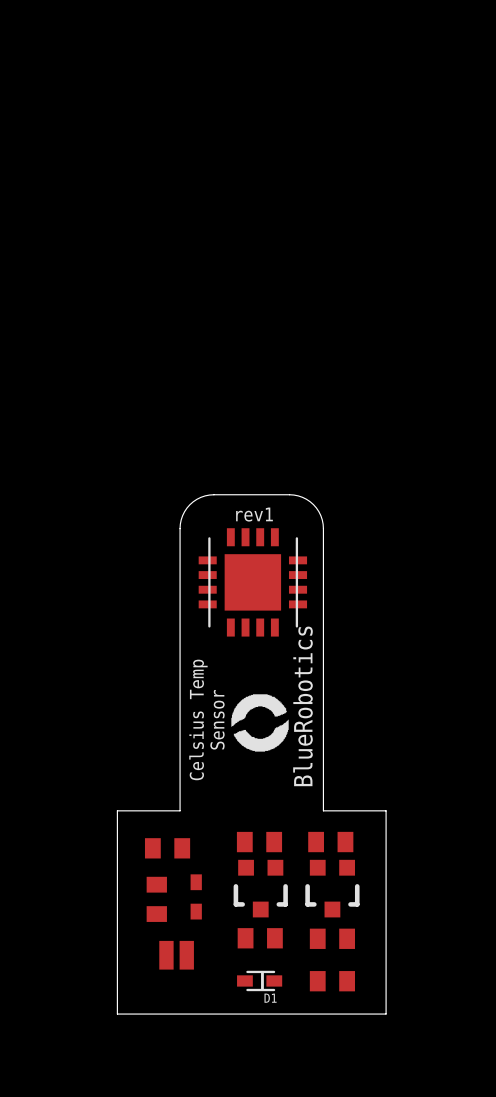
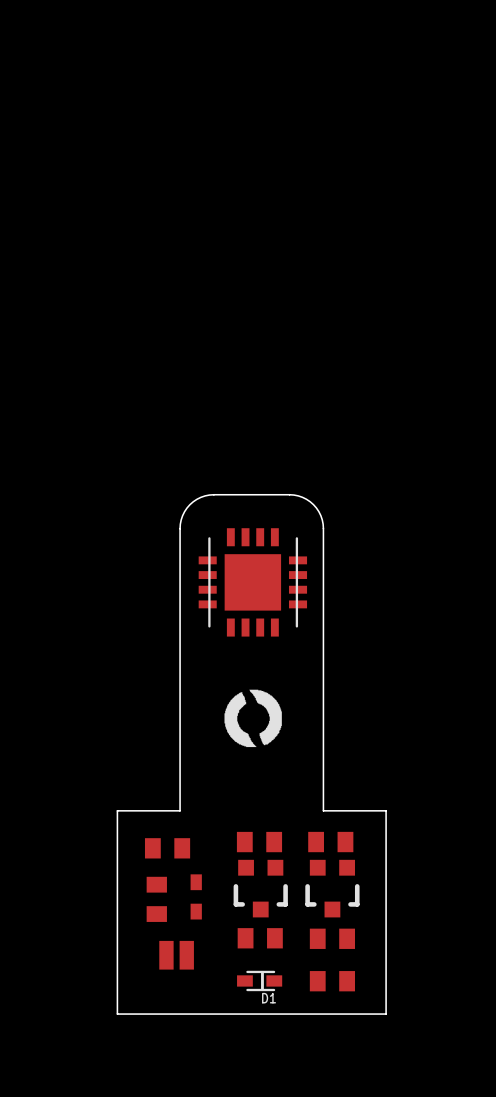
text: rev1 (254, 514) -> none
drawing shape: [231, 694, 289, 752] -> [224, 689, 282, 748]
text: BlueRobotics (303, 706) -> none
text: Celsius Temp (198, 719) -> none
text: Sensor (217, 719) -> none

